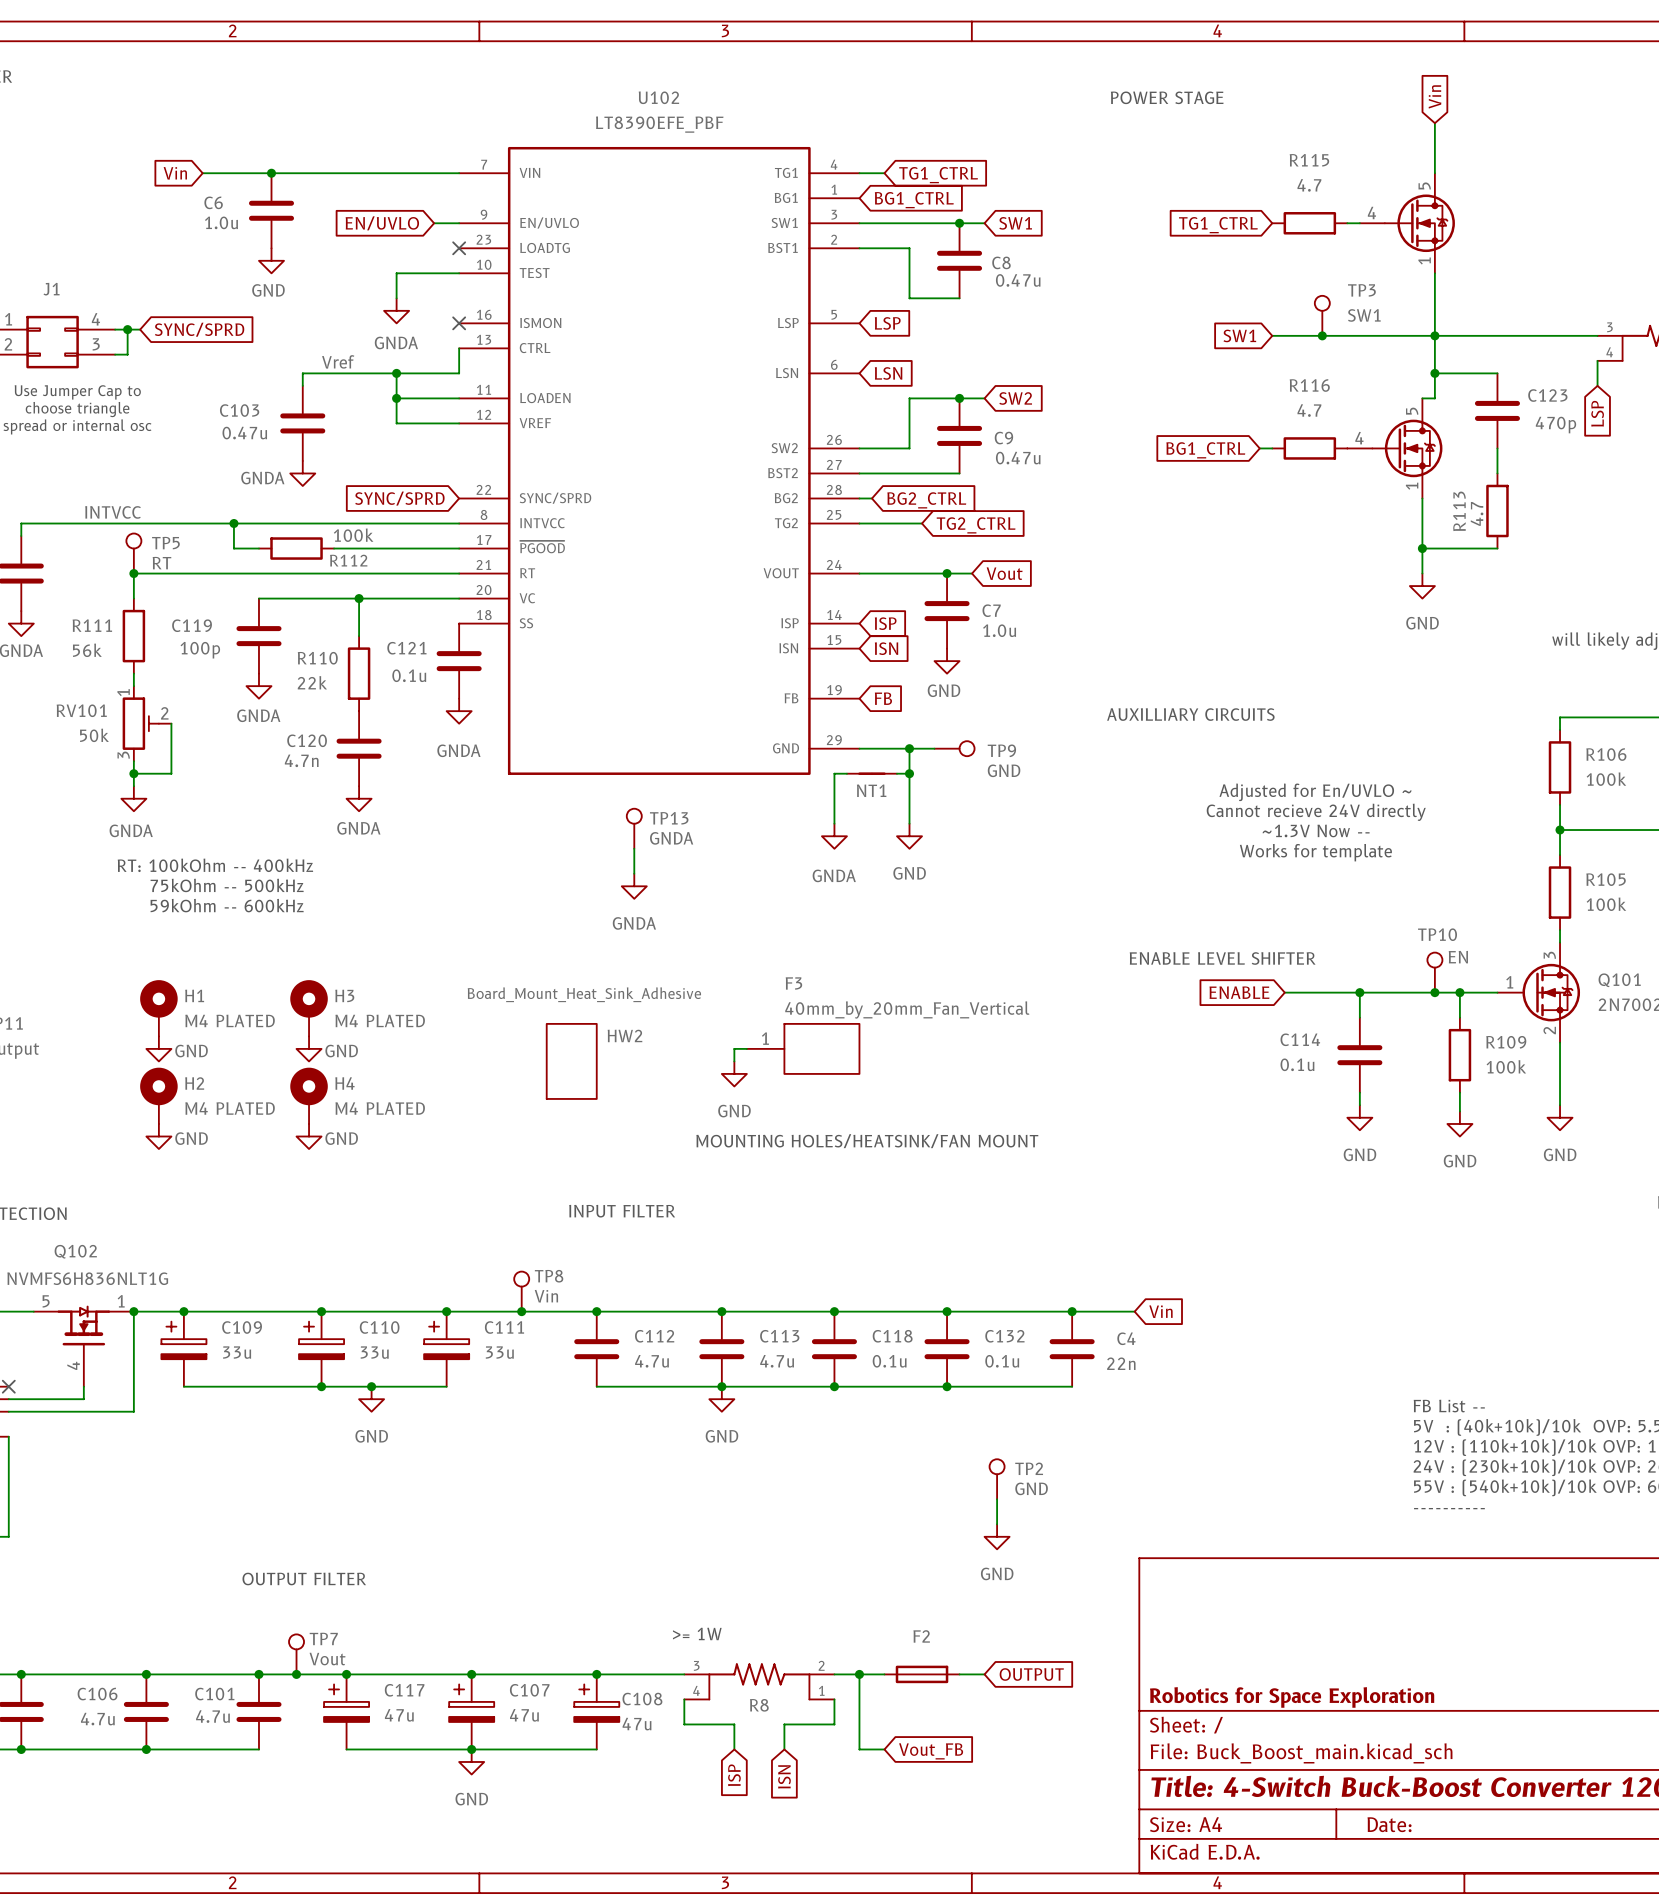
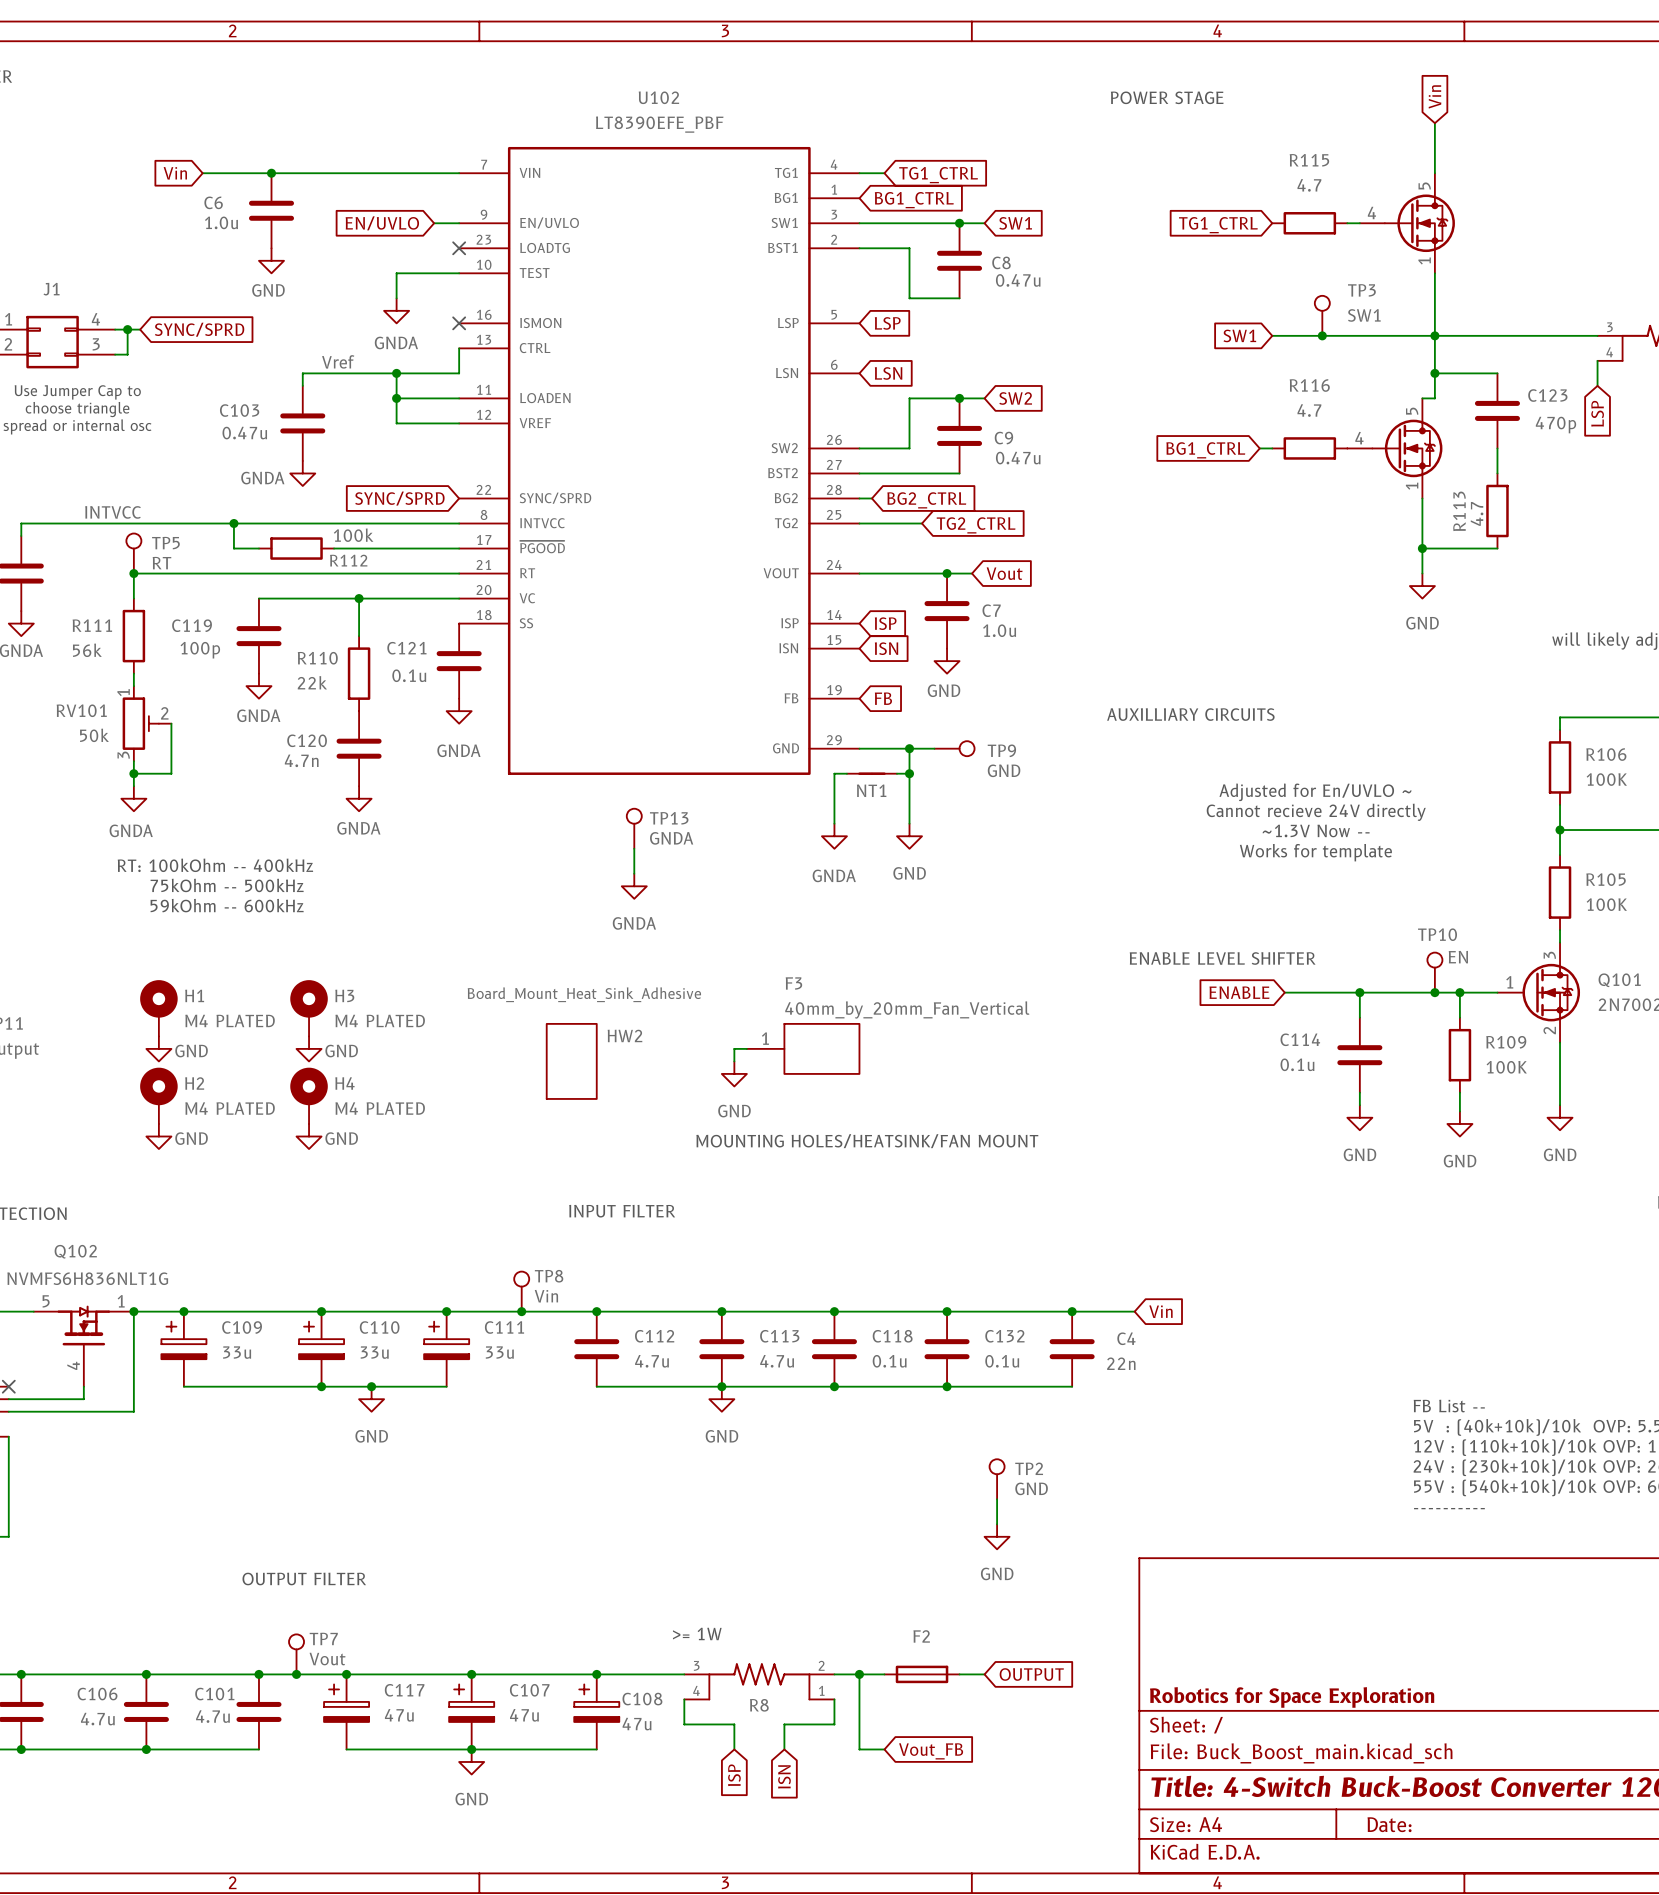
R106 value: 100k (1606, 779) -> 100K (1606, 779)
R105 value: 100k (1606, 904) -> 100K (1606, 904)
R109 value: 100k (1506, 1066) -> 100K (1506, 1067)

